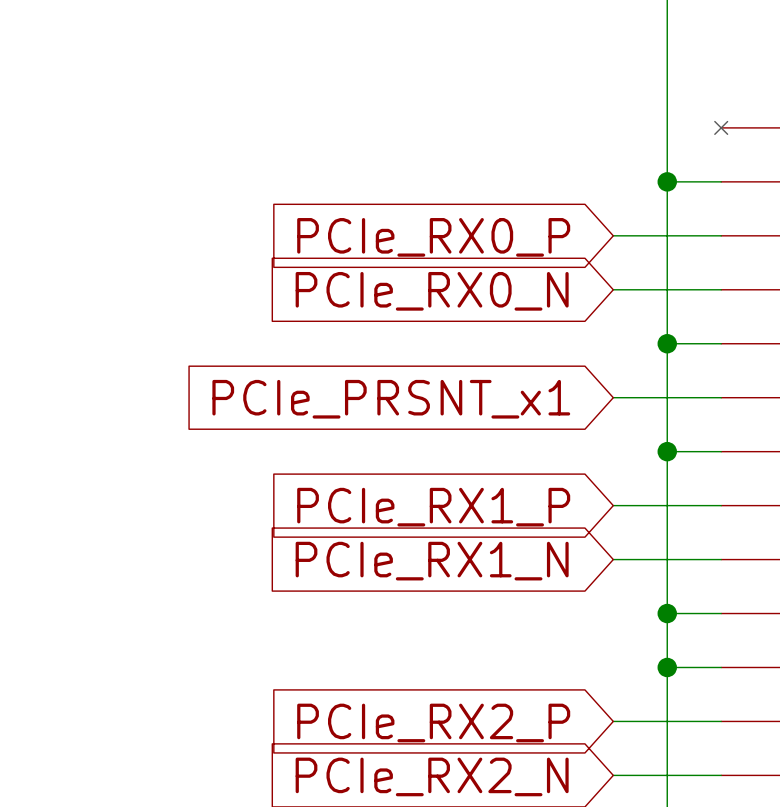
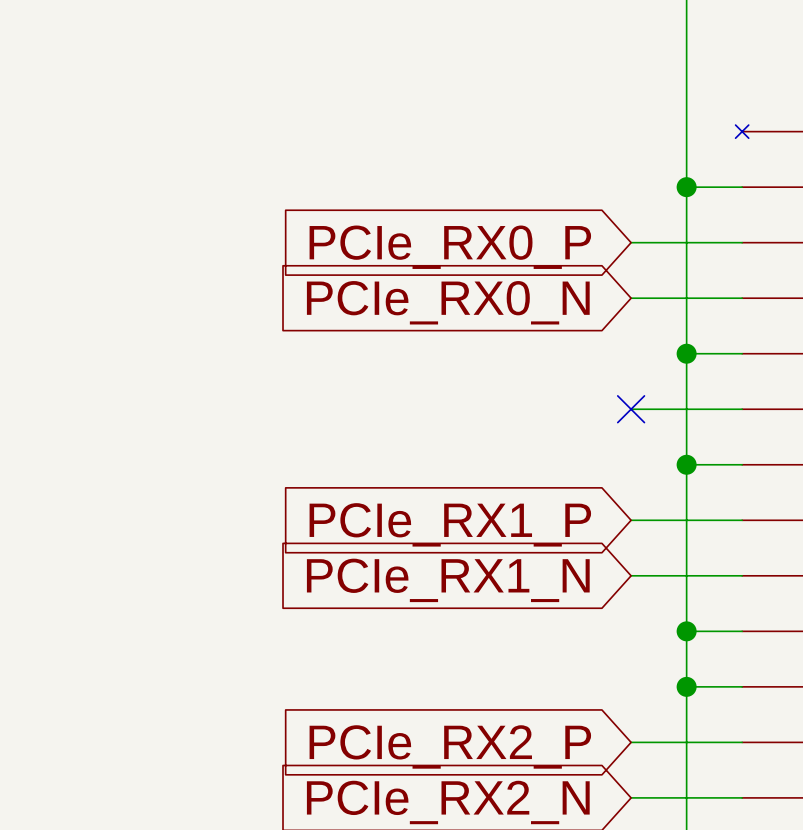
no-connect mark: none -> (631, 409)
global label: PCIe_PRSNT_x1 (391, 399) -> none

